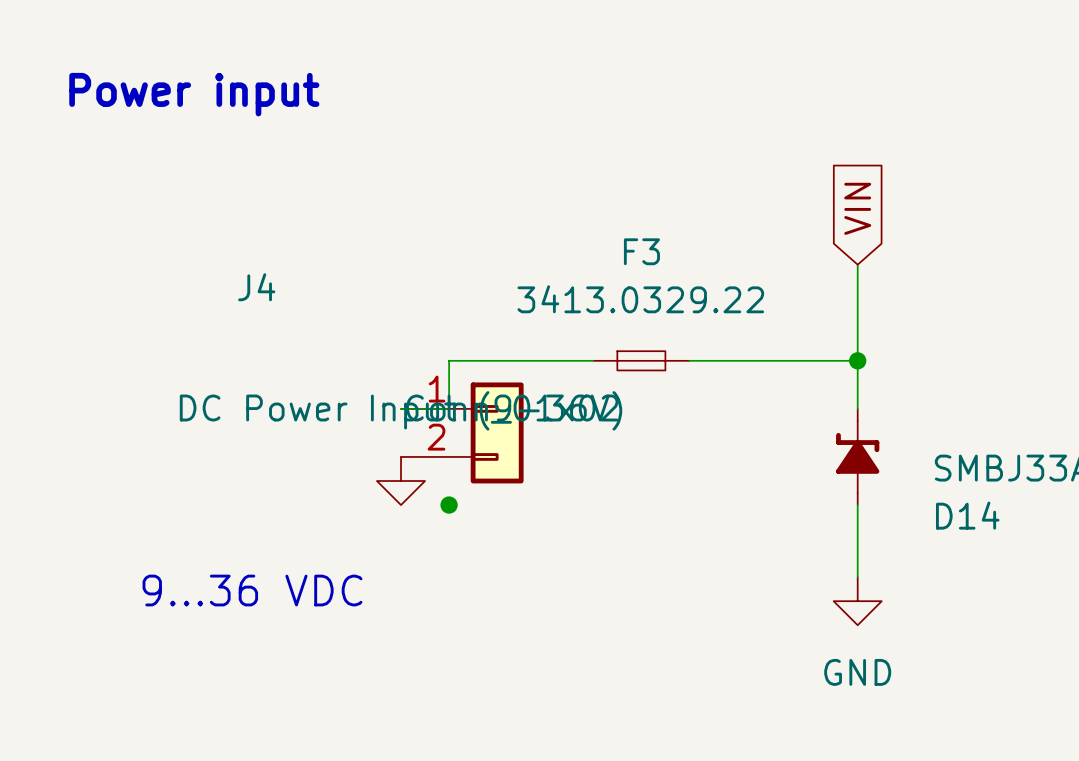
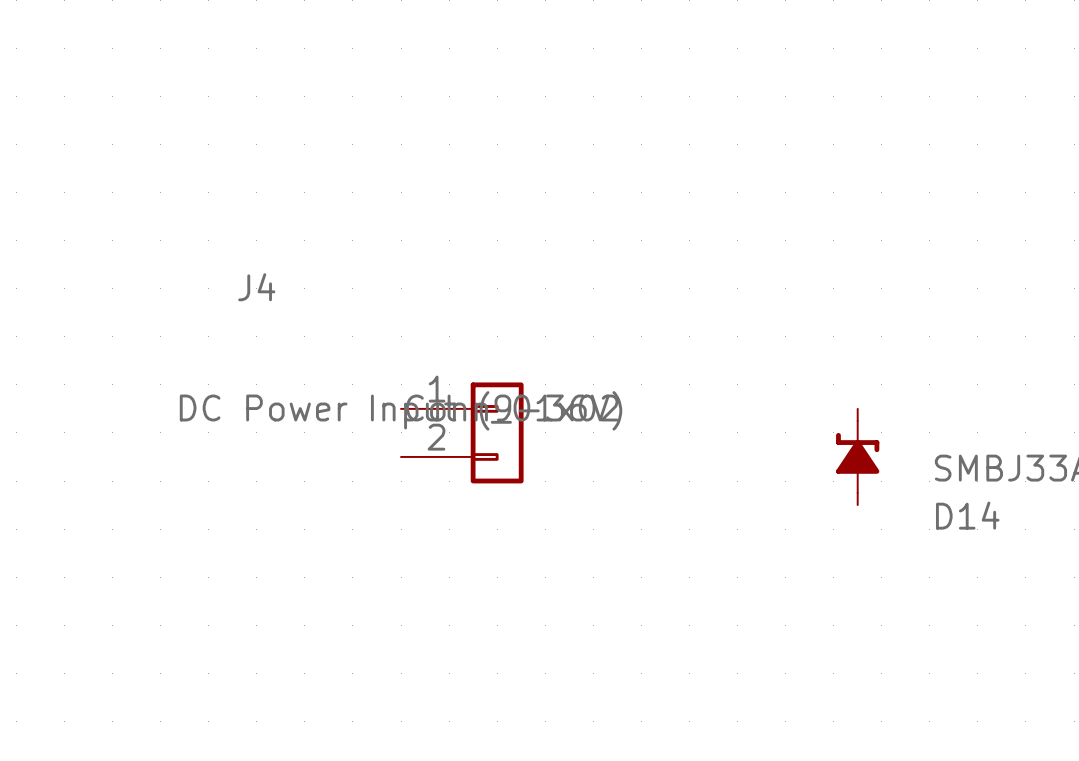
text: Power input (194, 94) -> none
global label: VIN (857, 208) -> none
wire: (857, 264) (857, 408) -> none
wire: (593, 360) (449, 360) (449, 408) (401, 408) -> none
F3: (641, 360) -> none
wire: (689, 360) (857, 360) -> none
junction: (857, 360) -> none
power symbol: (401, 481) -> none
junction: (449, 505) -> none
wire: (857, 505) (857, 577) -> none
text: 9...36 VDC (252, 590) -> none
power symbol: GND (857, 601) -> none

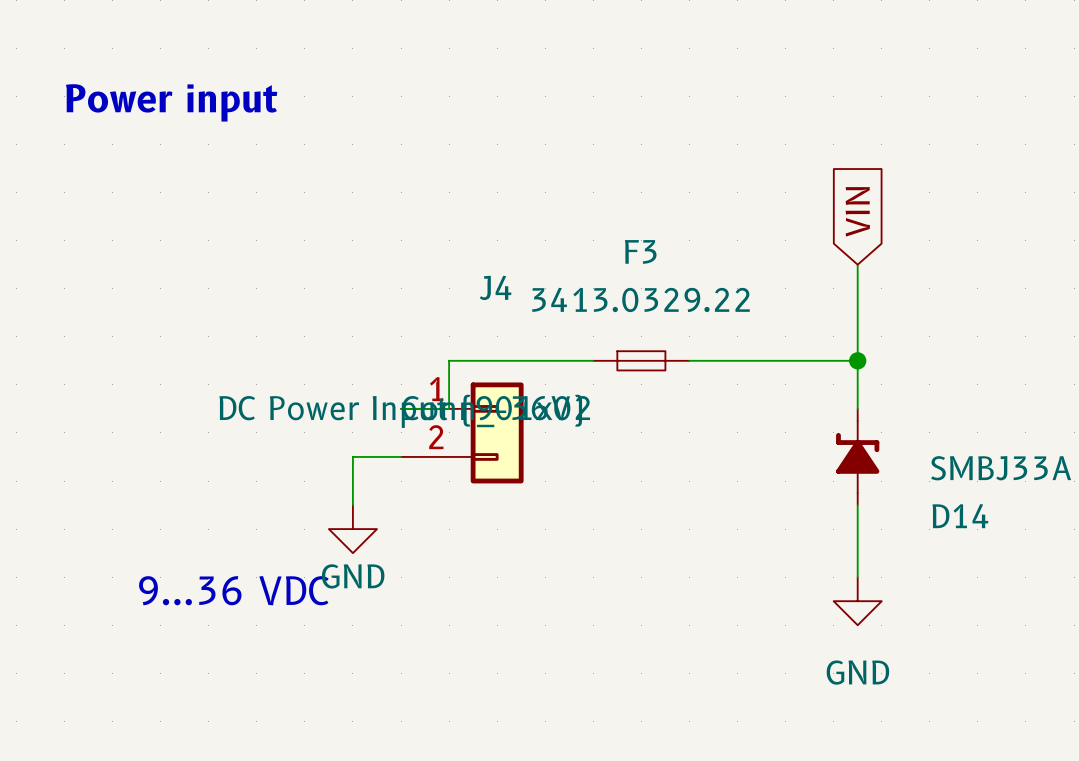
text: none -> Power input (171, 102)
global label: none -> VIN (857, 211)
wire: none -> (857, 264) (857, 408)
J4 name position: J4 (256, 287) -> J4 (495, 287)
wire: none -> (593, 360) (449, 360) (449, 408) (401, 408)
F3: none -> (641, 360)
wire: none -> (689, 360) (857, 360)
junction: none -> (857, 360)
wire: none -> (401, 456) (352, 456) (352, 505)
wire: none -> (857, 505) (857, 577)
power symbol: none -> GND (352, 529)
text: none -> 9...36 VDC (233, 590)
power symbol: none -> GND (857, 601)

